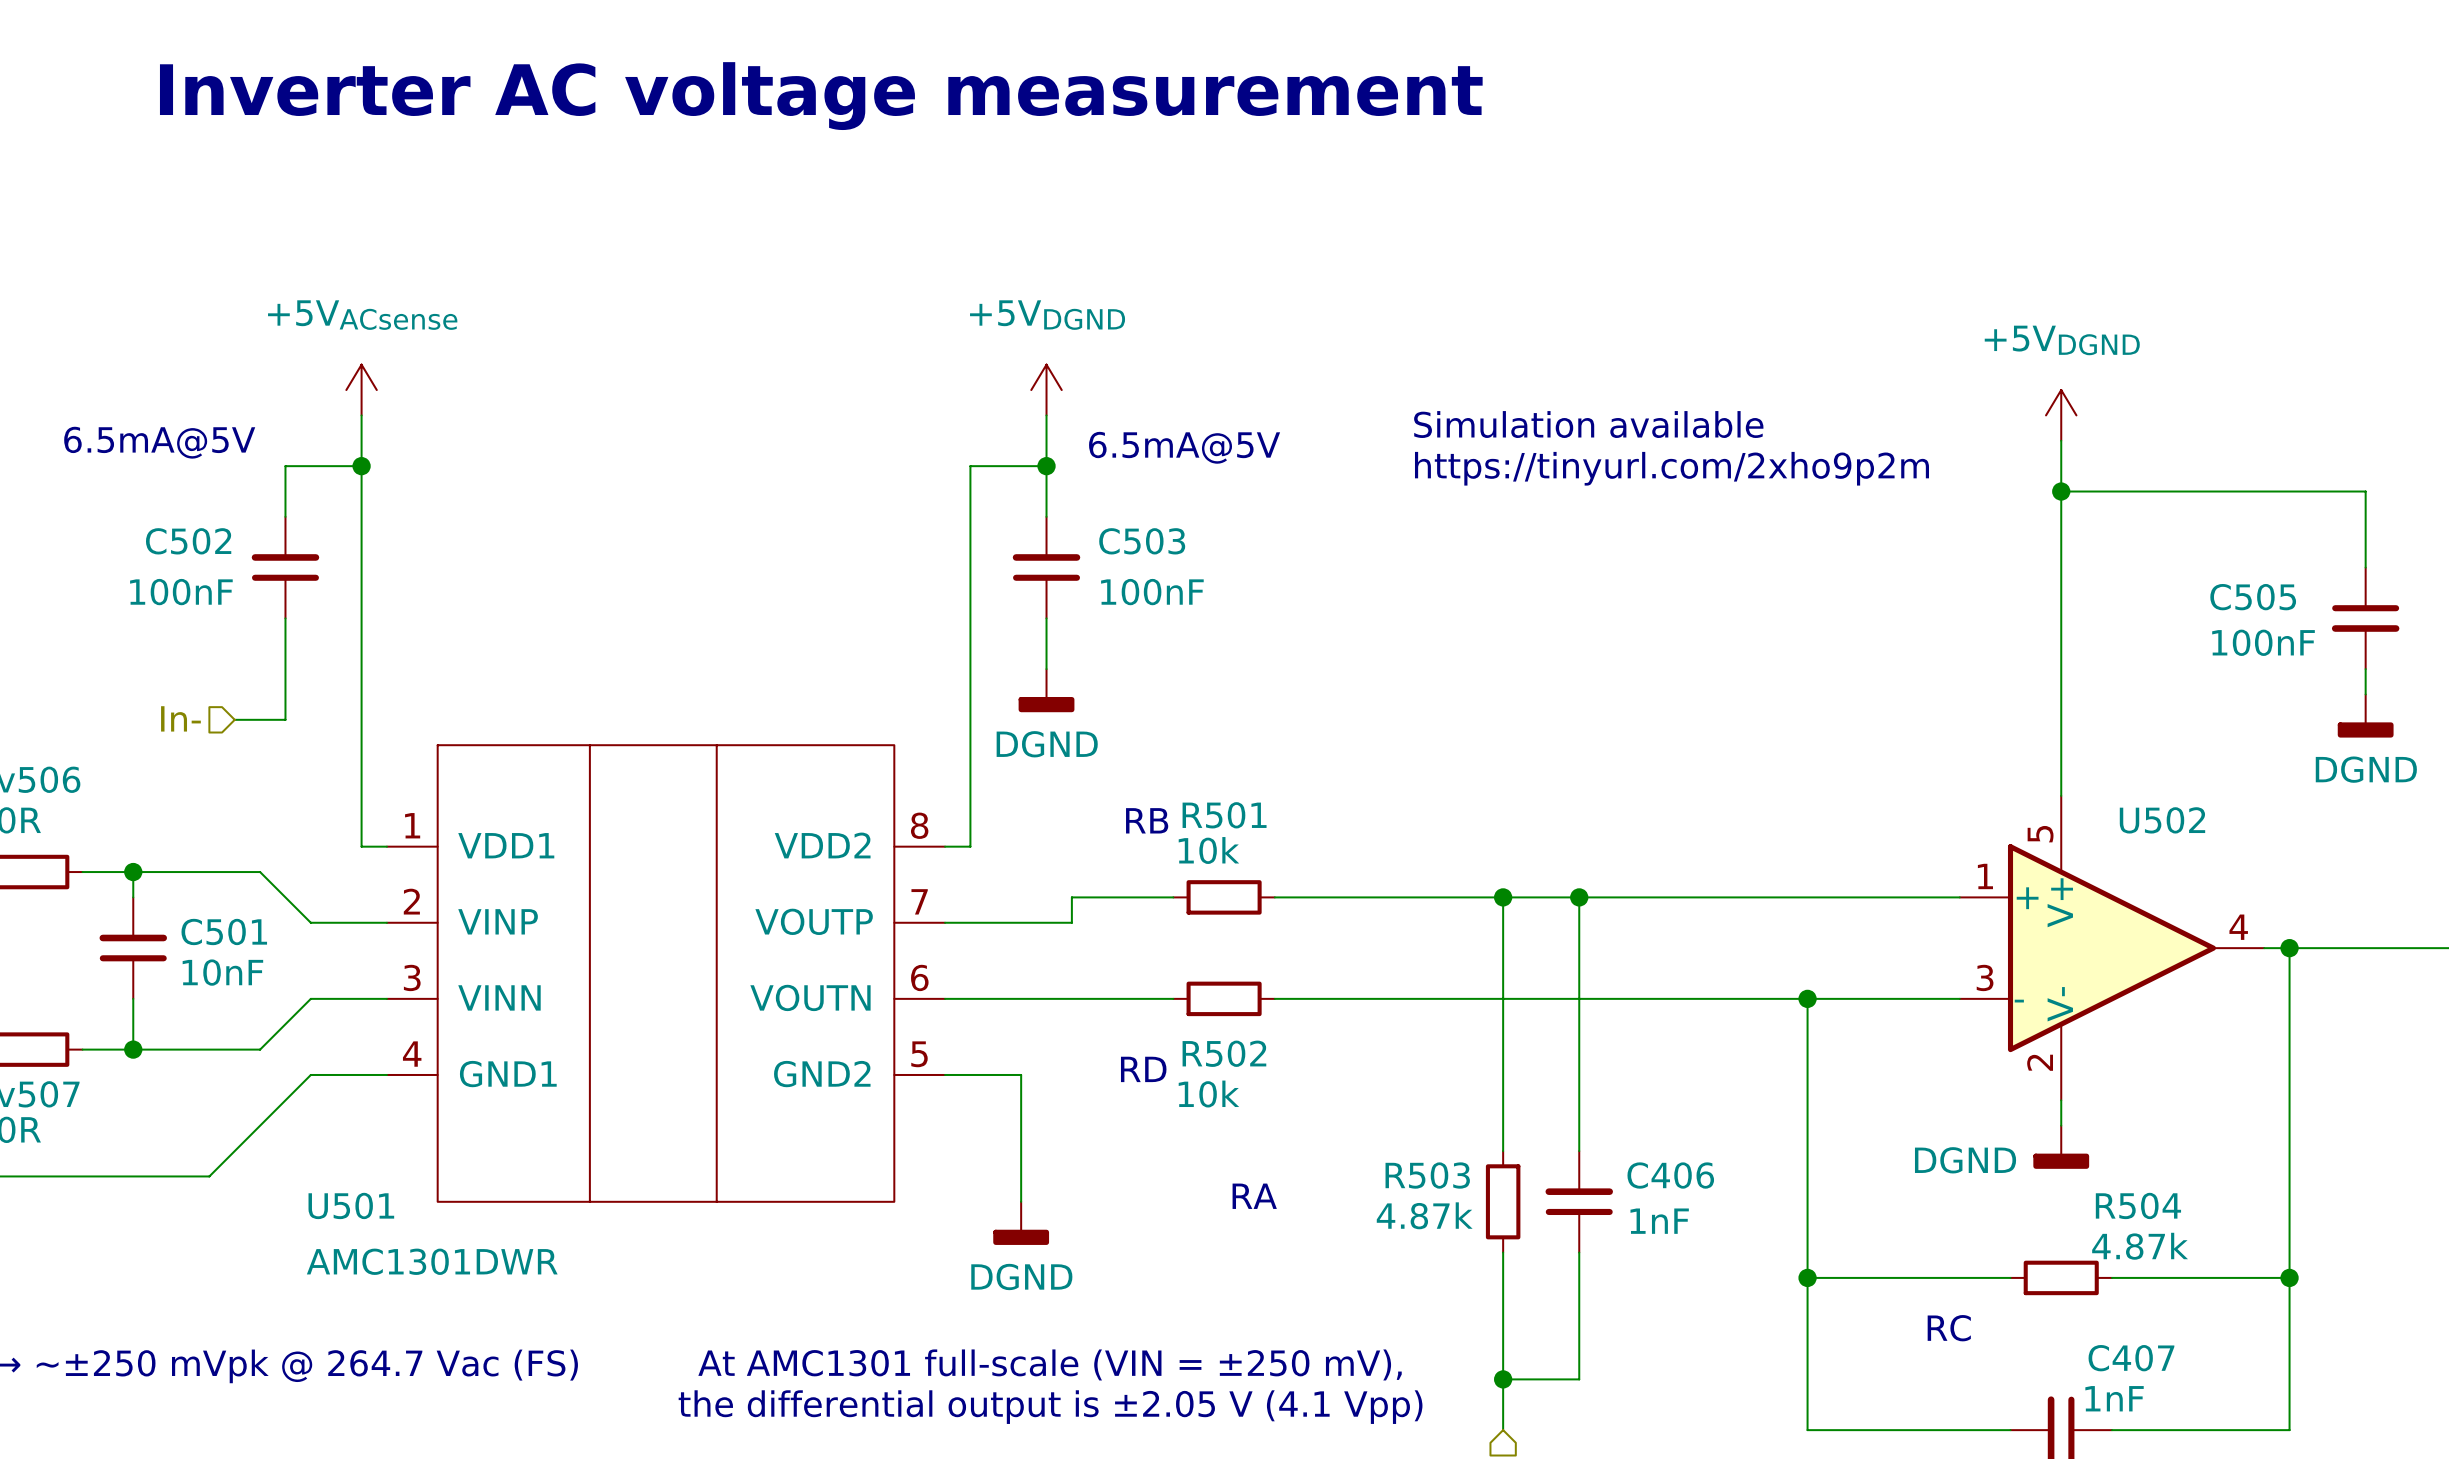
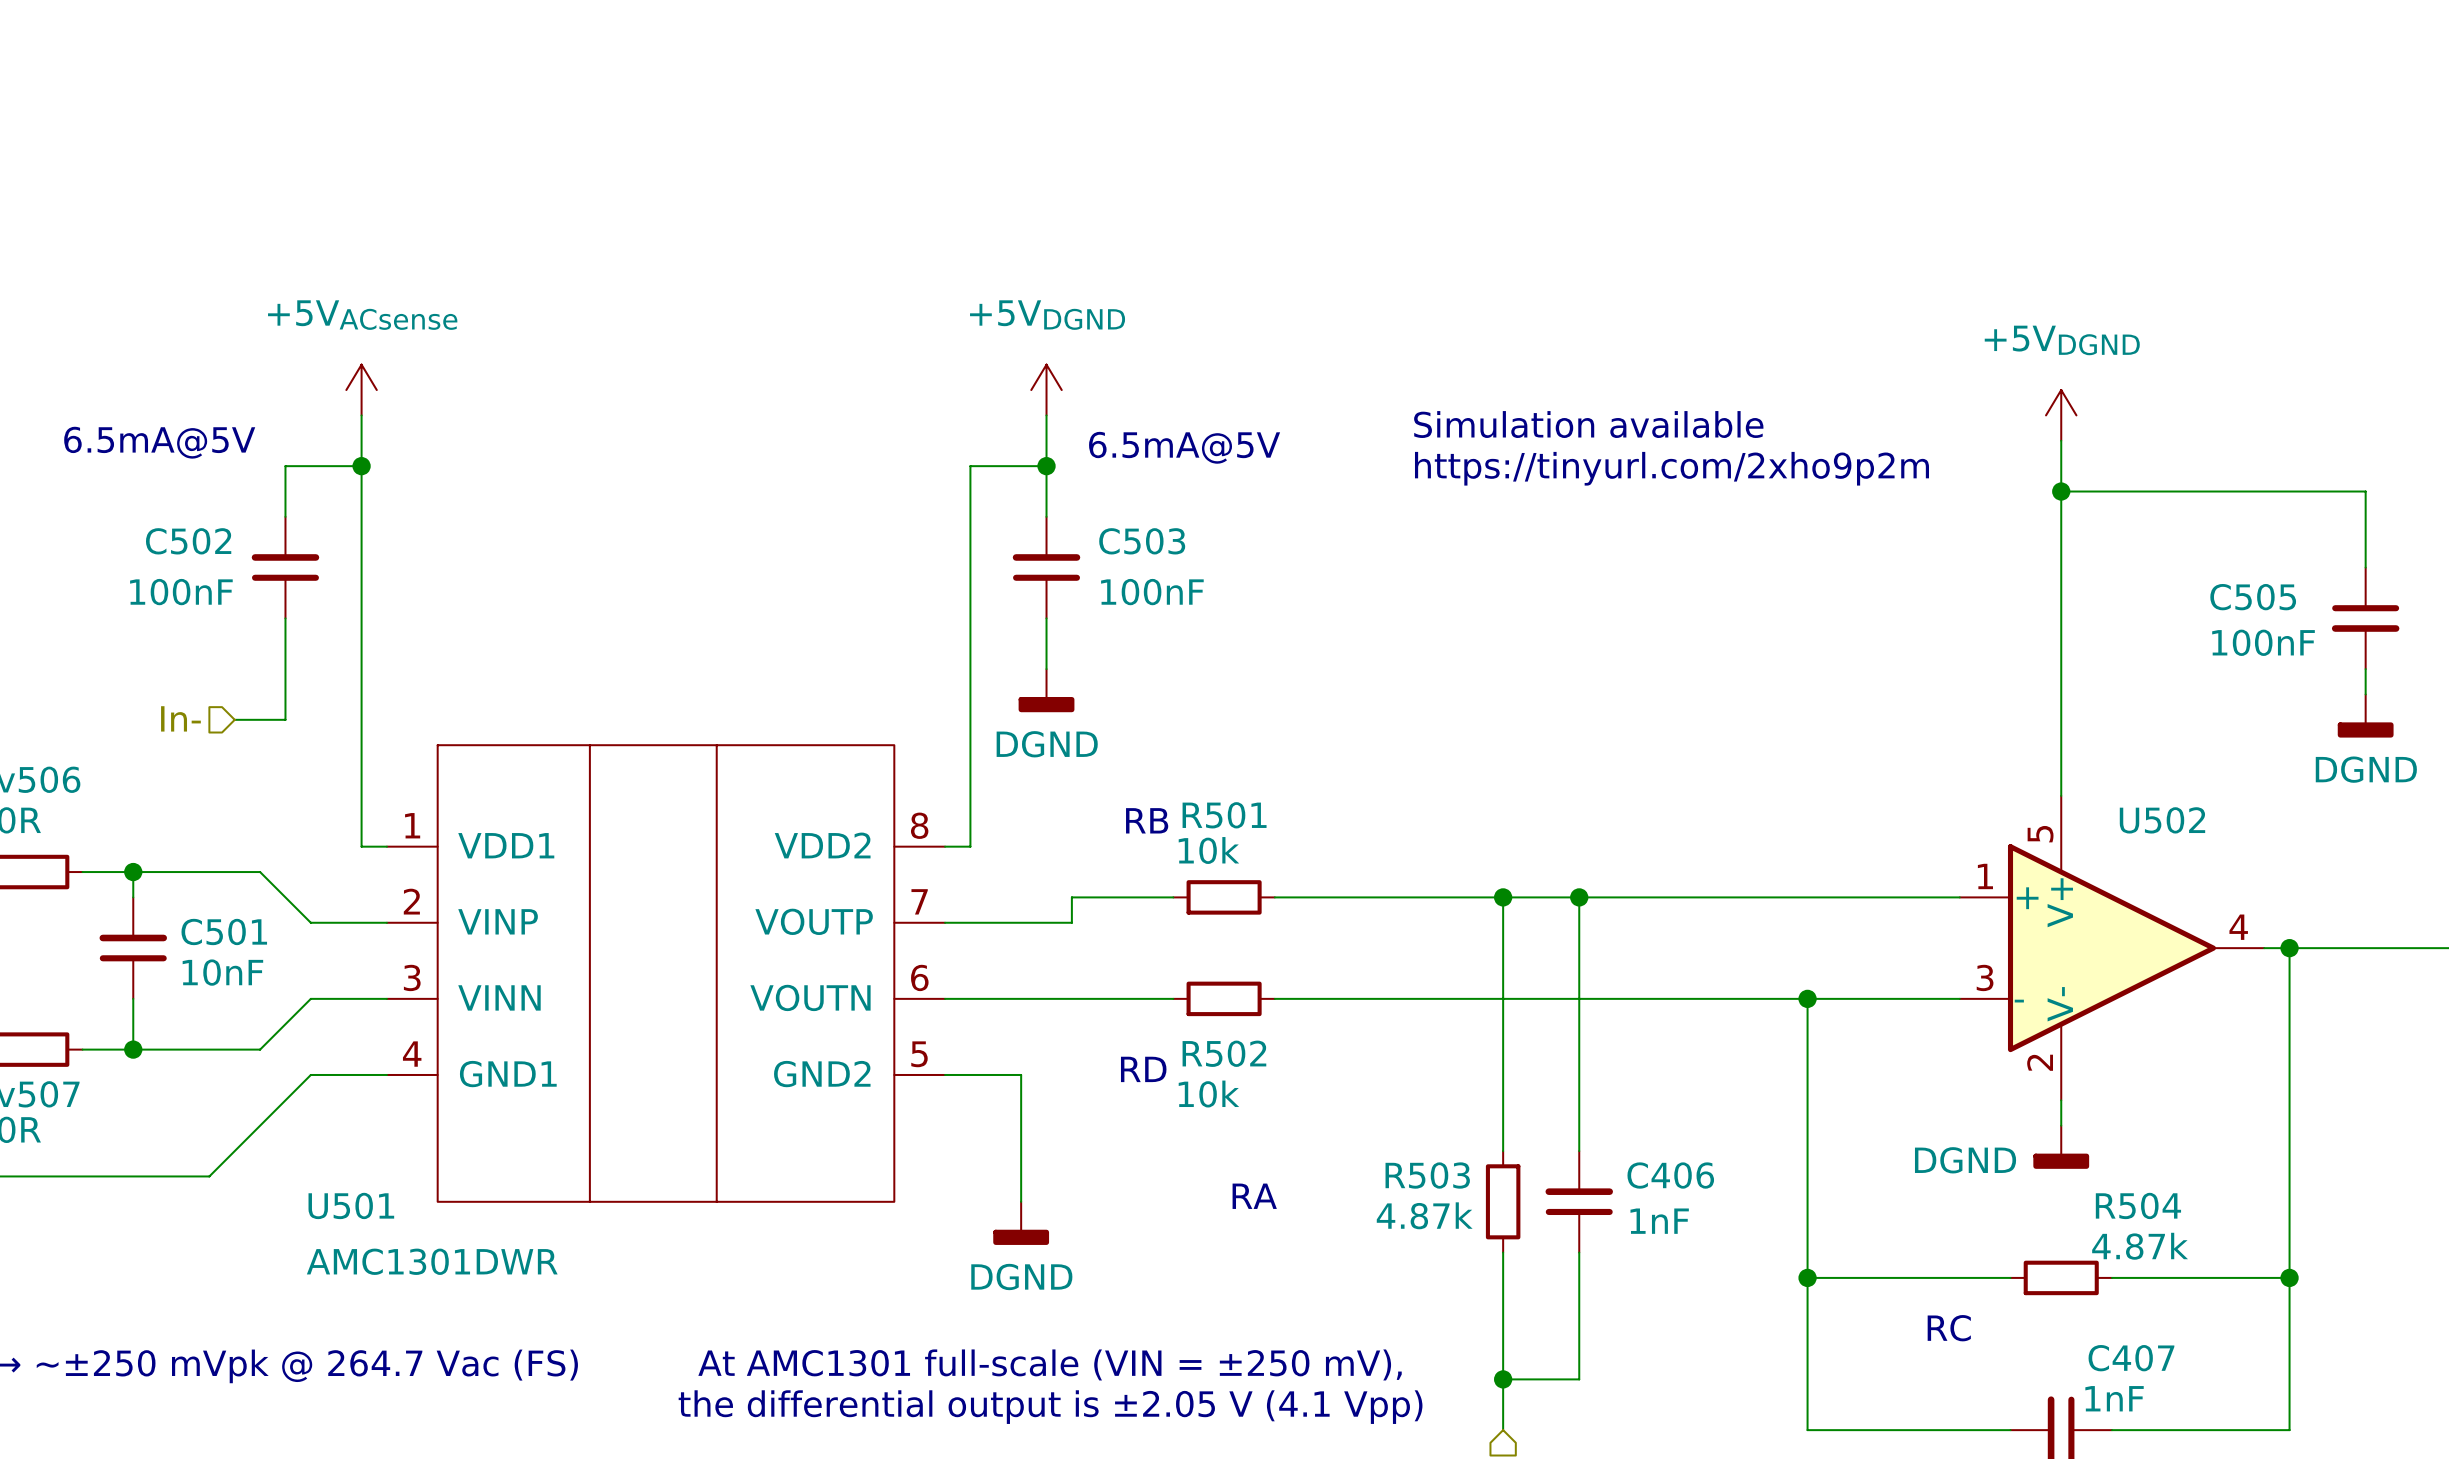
text: Inverter AC voltage measurement (821, 96) -> none

